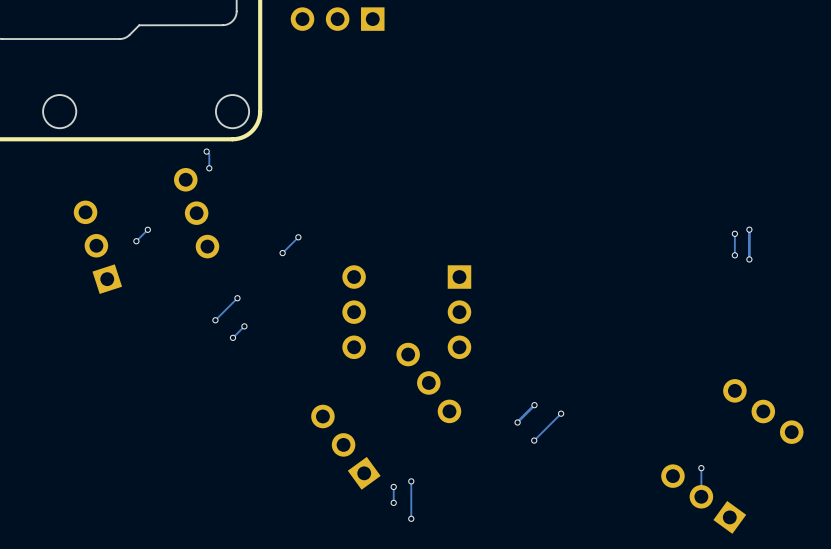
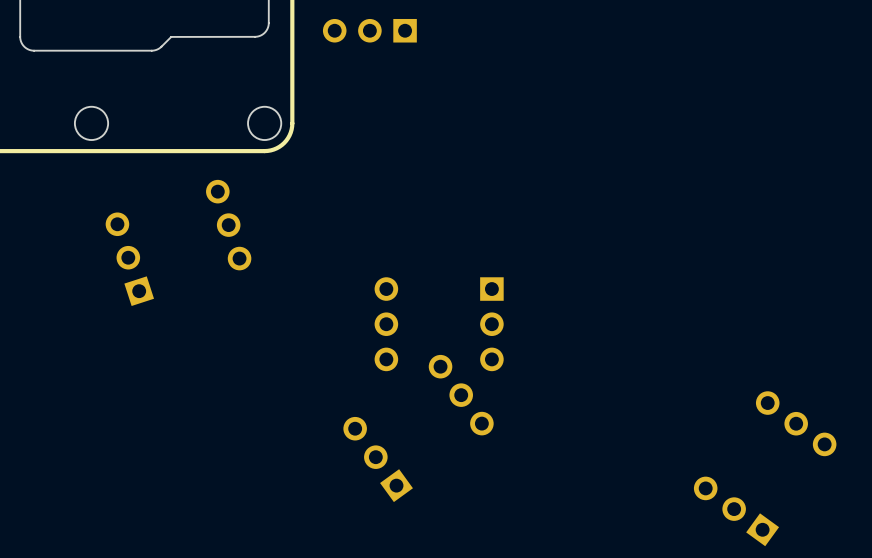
track: (206, 151) (209, 154) (209, 168) -> none
via: (206, 151) -> none
via: (209, 168) -> none
track: (147, 229) (136, 241) -> none
via: (147, 229) -> none
track: (749, 229) (749, 259) -> none
via: (749, 229) -> none
track: (734, 233) (734, 255) -> none
via: (734, 233) -> none
track: (298, 237) (282, 253) -> none
via: (298, 237) -> none
via: (136, 241) -> none
via: (282, 253) -> none
via: (734, 255) -> none
via: (749, 259) -> none
track: (237, 298) (215, 320) -> none
via: (237, 298) -> none
via: (215, 320) -> none
track: (244, 326) (232, 337) -> none
via: (244, 326) -> none
via: (232, 337) -> none
track: (534, 405) (517, 422) -> none
via: (534, 405) -> none
track: (561, 413) (534, 440) -> none
via: (561, 413) -> none
via: (517, 422) -> none
via: (534, 440) -> none
track: (701, 468) (701, 496) -> none
via: (701, 468) -> none
track: (411, 481) (411, 518) -> none
via: (411, 481) -> none
track: (393, 486) (393, 502) -> none
via: (393, 486) -> none
via: (393, 502) -> none
via: (411, 518) -> none

